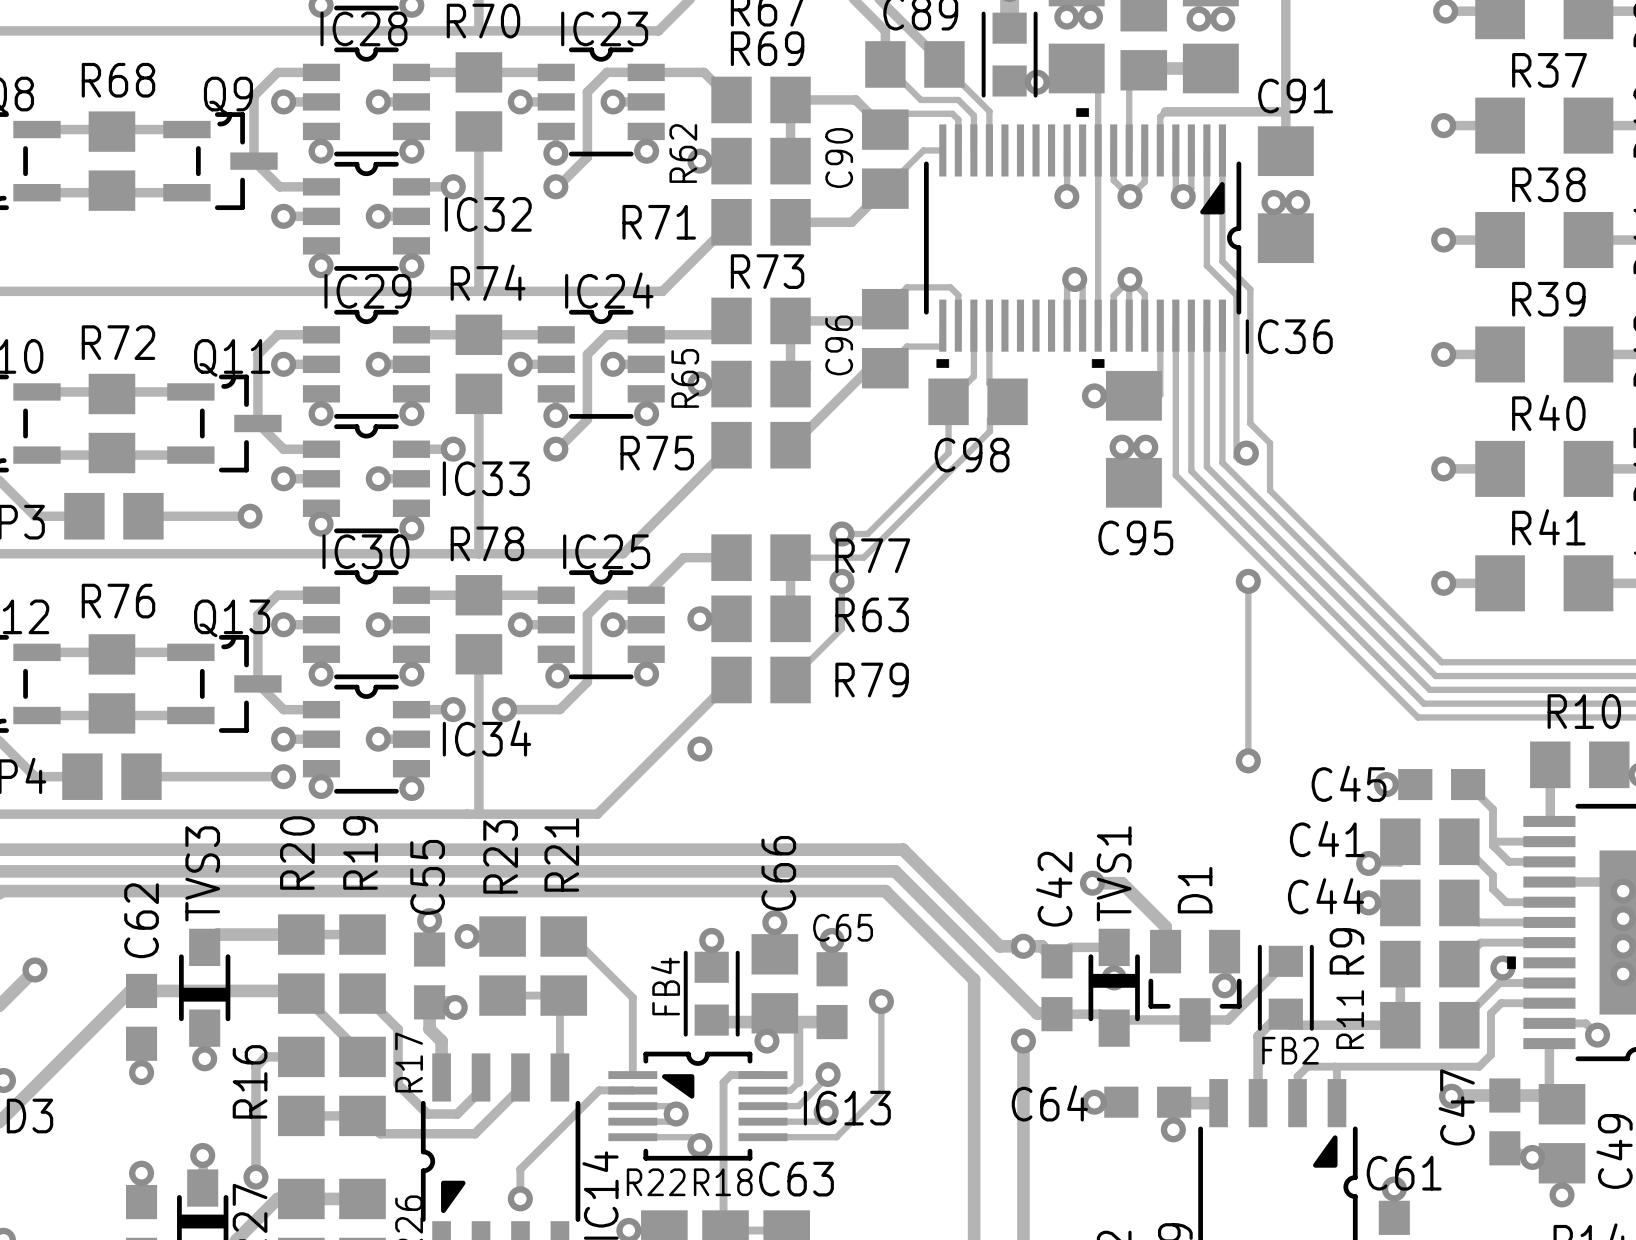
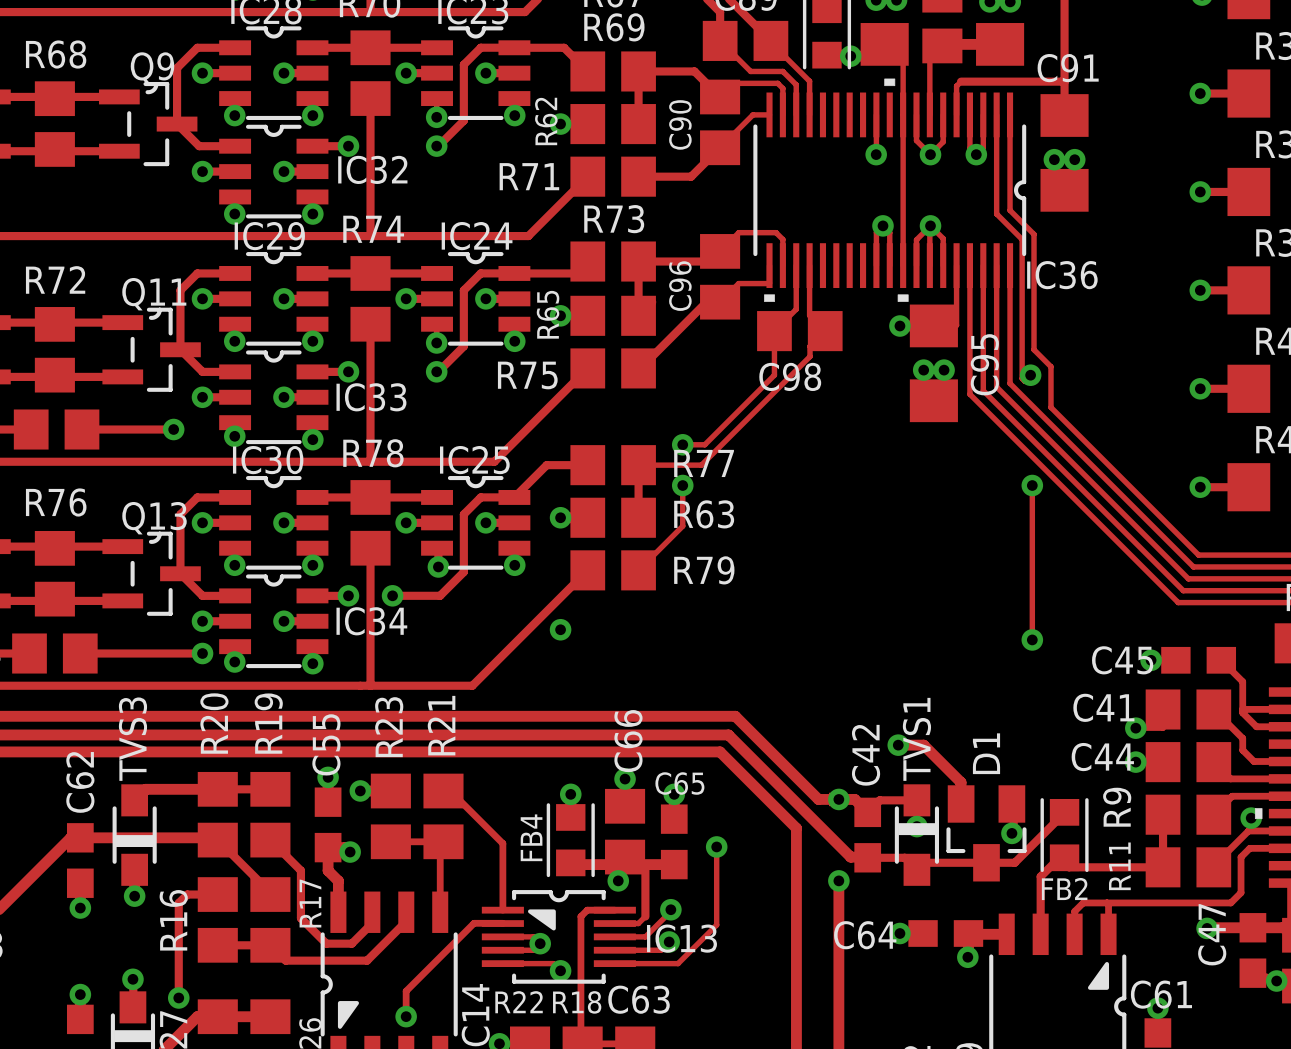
IC36 footprint: [924, 108, 1242, 368] -> [753, 78, 1027, 302]
C95 name rotation: 0° (1135, 537) -> 90° counterclockwise (984, 364)
C95 name position: C95 (1135, 537) -> C95 (984, 364)

